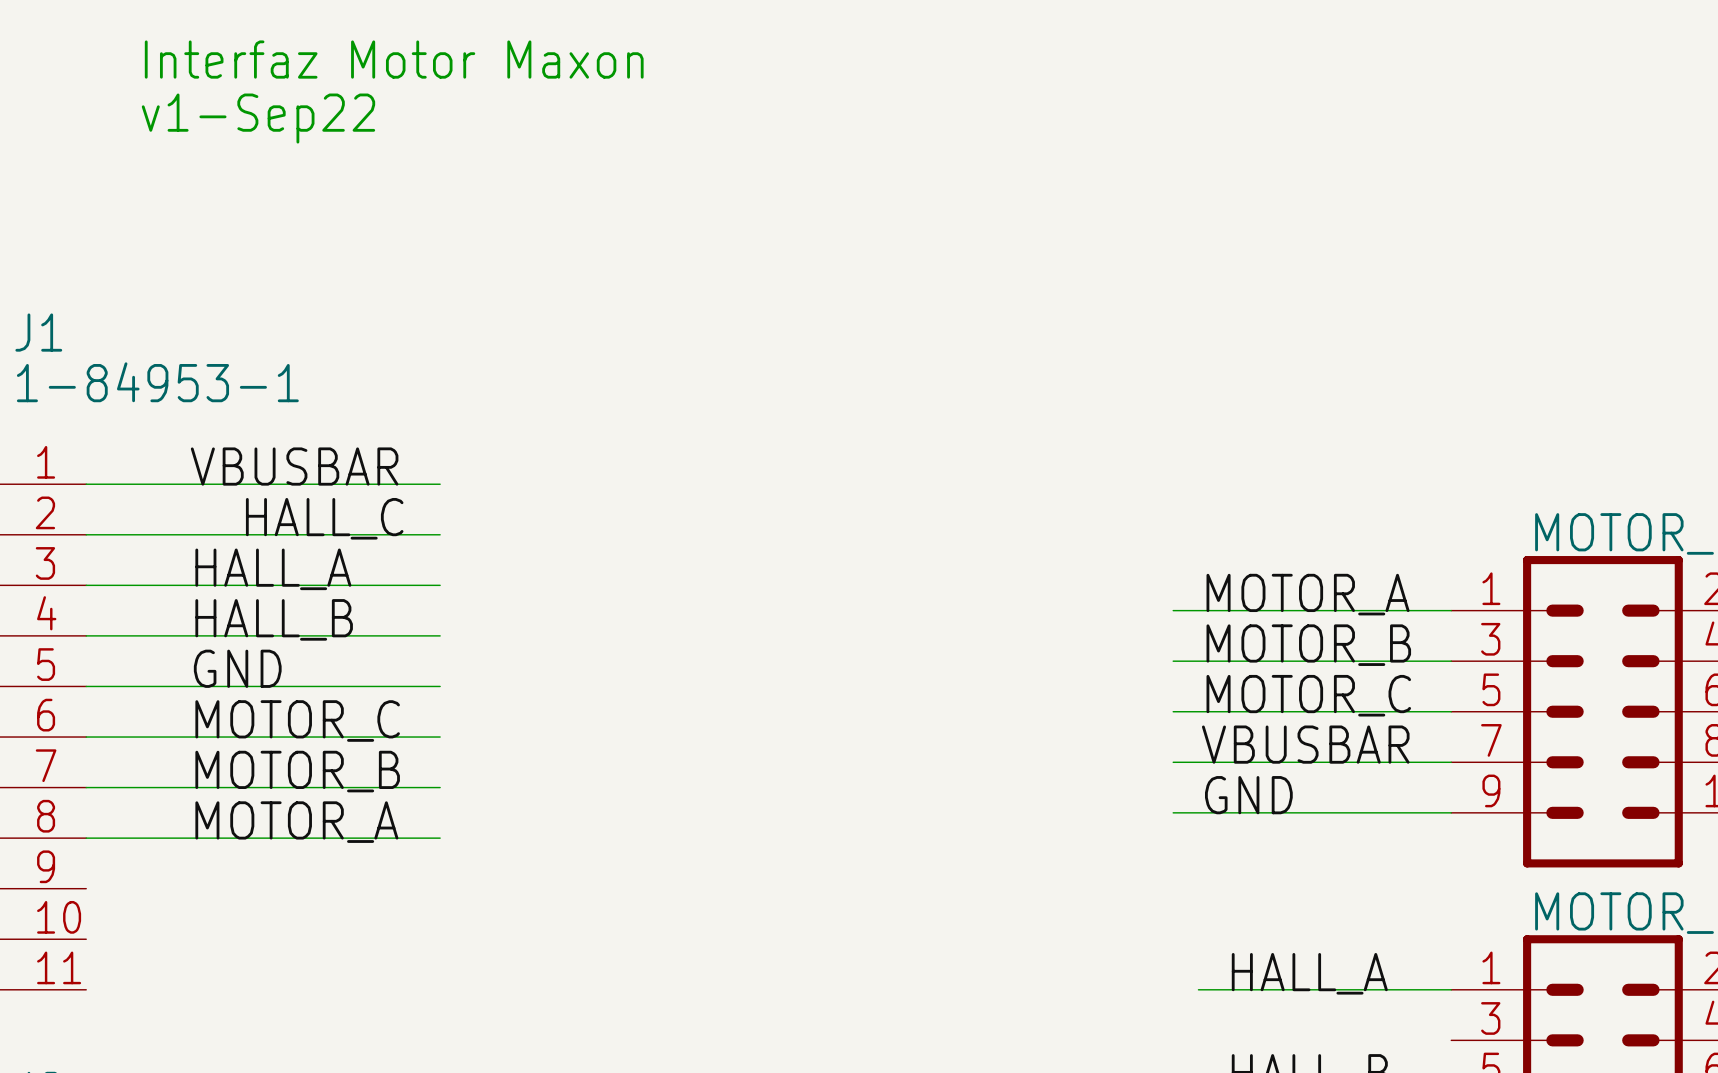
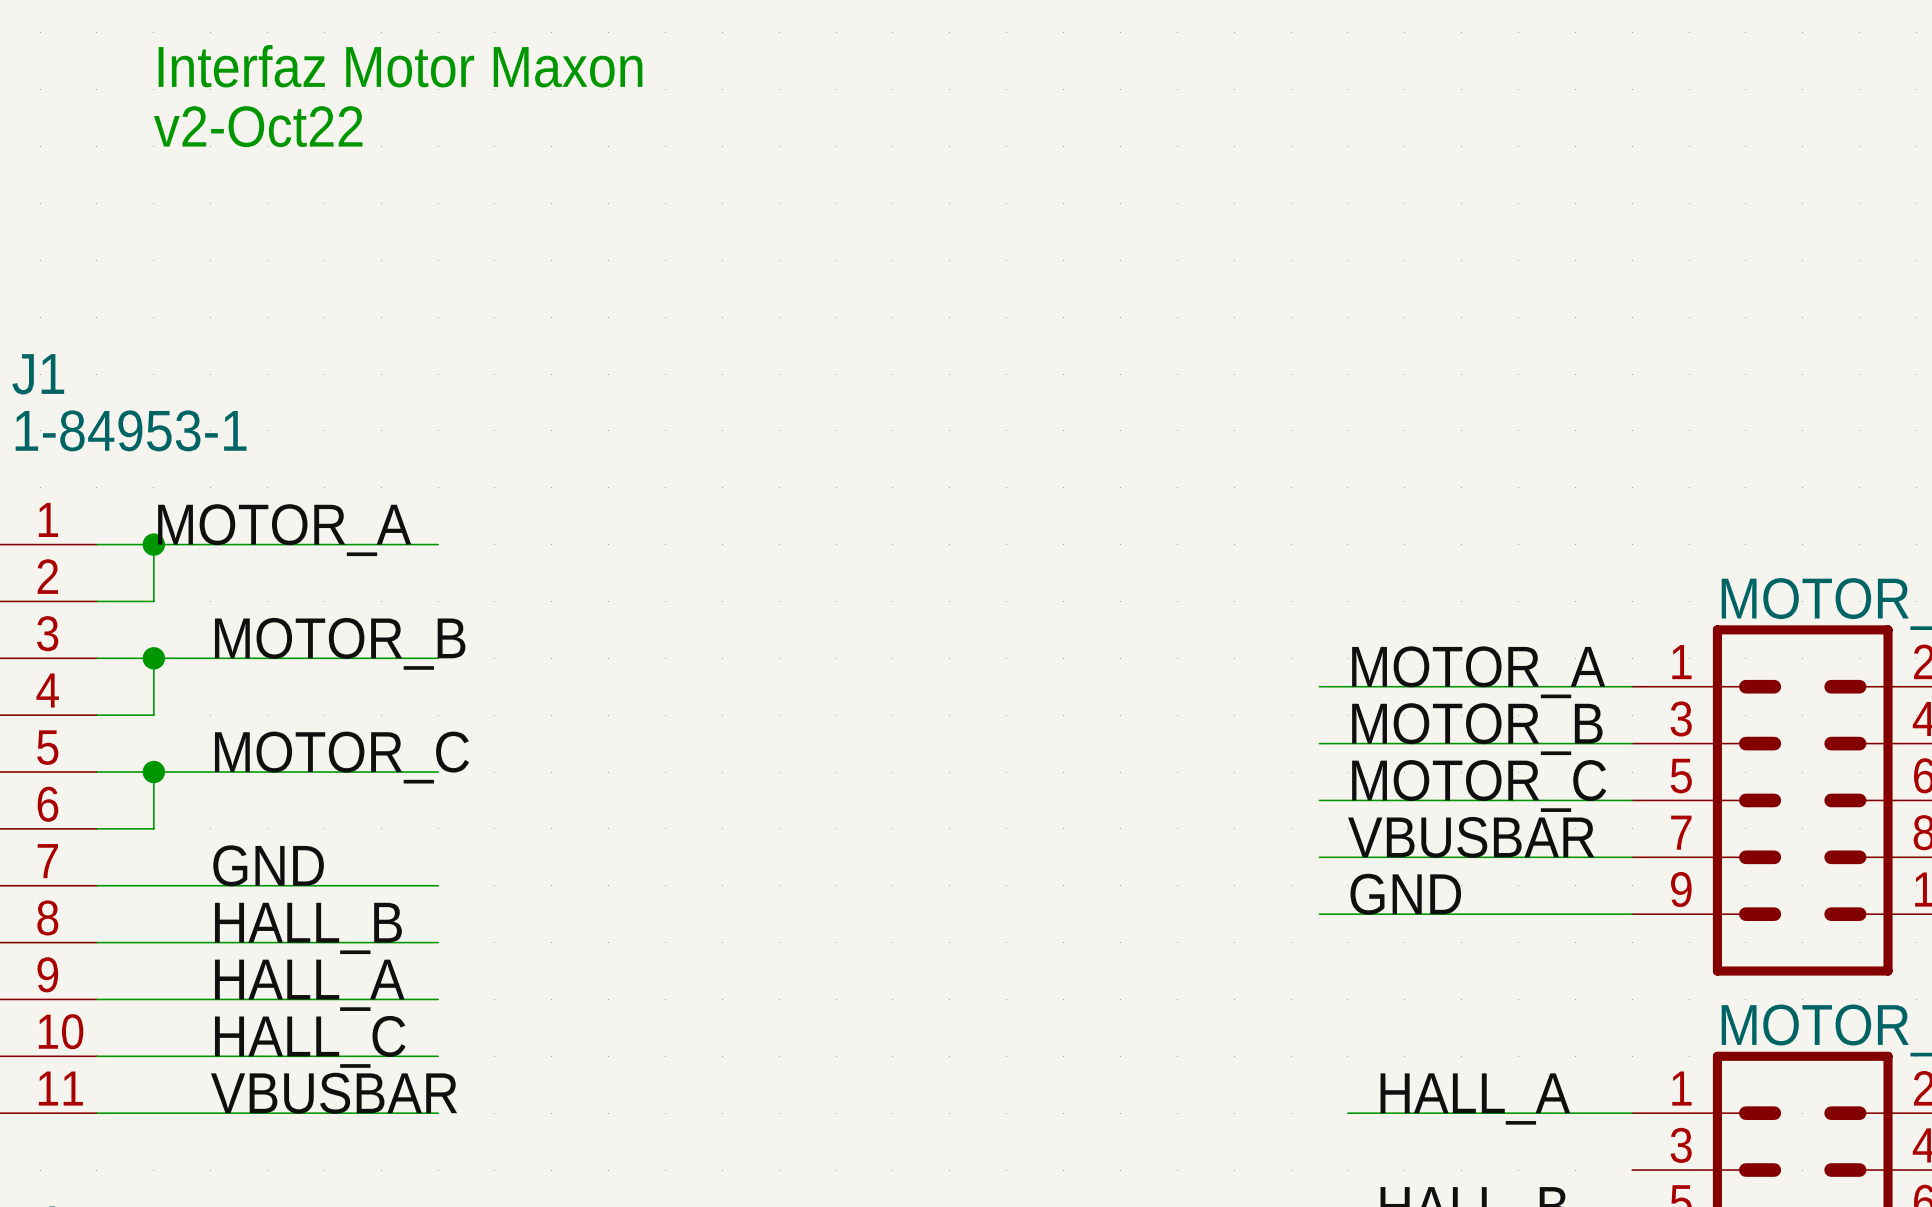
text: v1-Sep22 (258, 118) -> v2-Oct22 (258, 126)
label: VBUSBAR (294, 466) -> none
label: none -> MOTOR_A (284, 530)
junction: none -> (153, 544)
wire: (389, 484) (440, 484) -> none
label position: HALL_C (324, 518) -> HALL_C (310, 1041)
wire: (136, 534) (440, 534) -> (153, 601) (153, 544)
label: HALL_A (273, 569) -> MOTOR_B (340, 643)
junction: none -> (153, 658)
wire: (389, 585) (440, 585) -> none
label: HALL_B (274, 619) -> none
wire: (136, 635) (440, 635) -> (153, 715) (153, 658)
label: GND (237, 668) -> MOTOR_C (342, 757)
junction: none -> (153, 772)
wire: (389, 686) (440, 686) -> none
label: MOTOR_C (297, 721) -> none
wire: (136, 737) (440, 737) -> (153, 828) (153, 772)
label: MOTOR_B (297, 771) -> GND (268, 865)
wire: (389, 787) (440, 787) -> none
label: MOTOR_A (296, 822) -> HALL_B (308, 928)
wire: (389, 838) (440, 838) -> none
label: none -> HALL_A (309, 985)
wire: none -> (96, 999) (438, 999)
wire: none -> (96, 1056) (438, 1056)
label: none -> VBUSBAR (334, 1093)
wire: none -> (96, 1113) (438, 1113)

